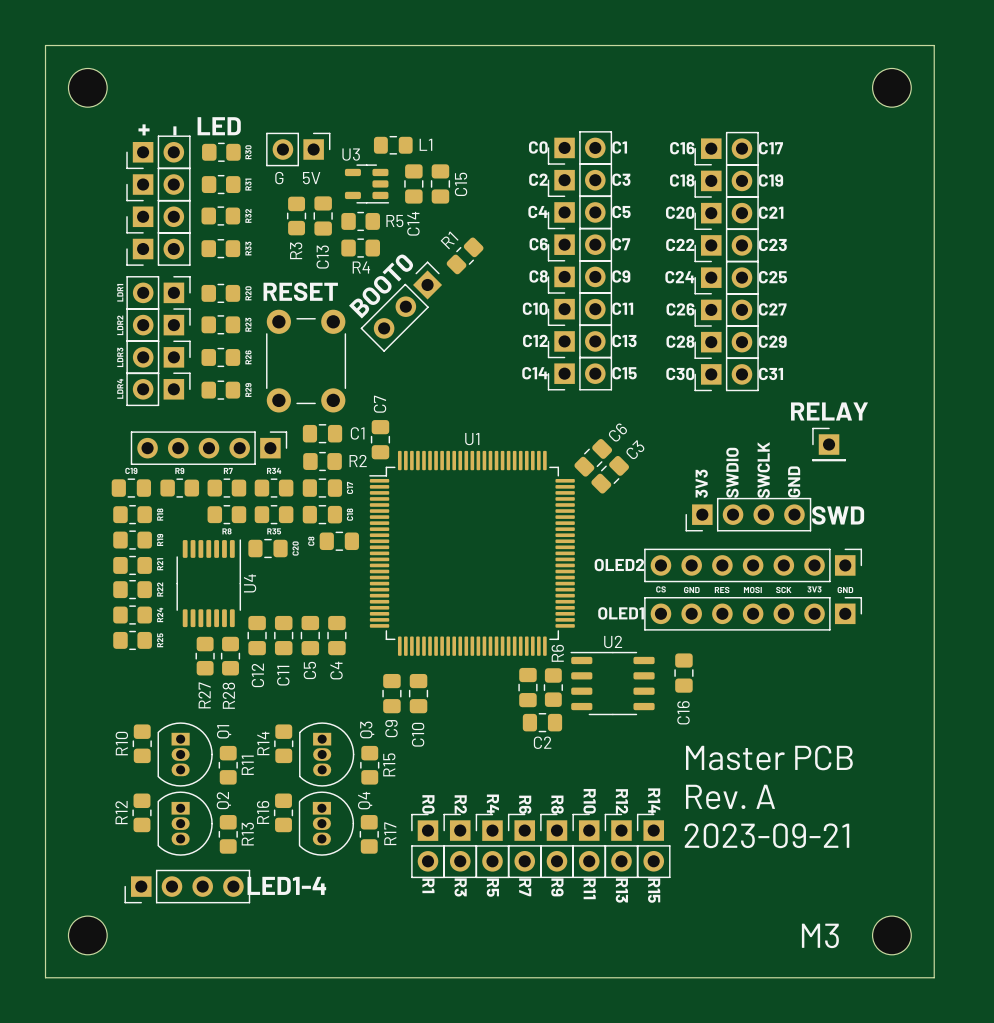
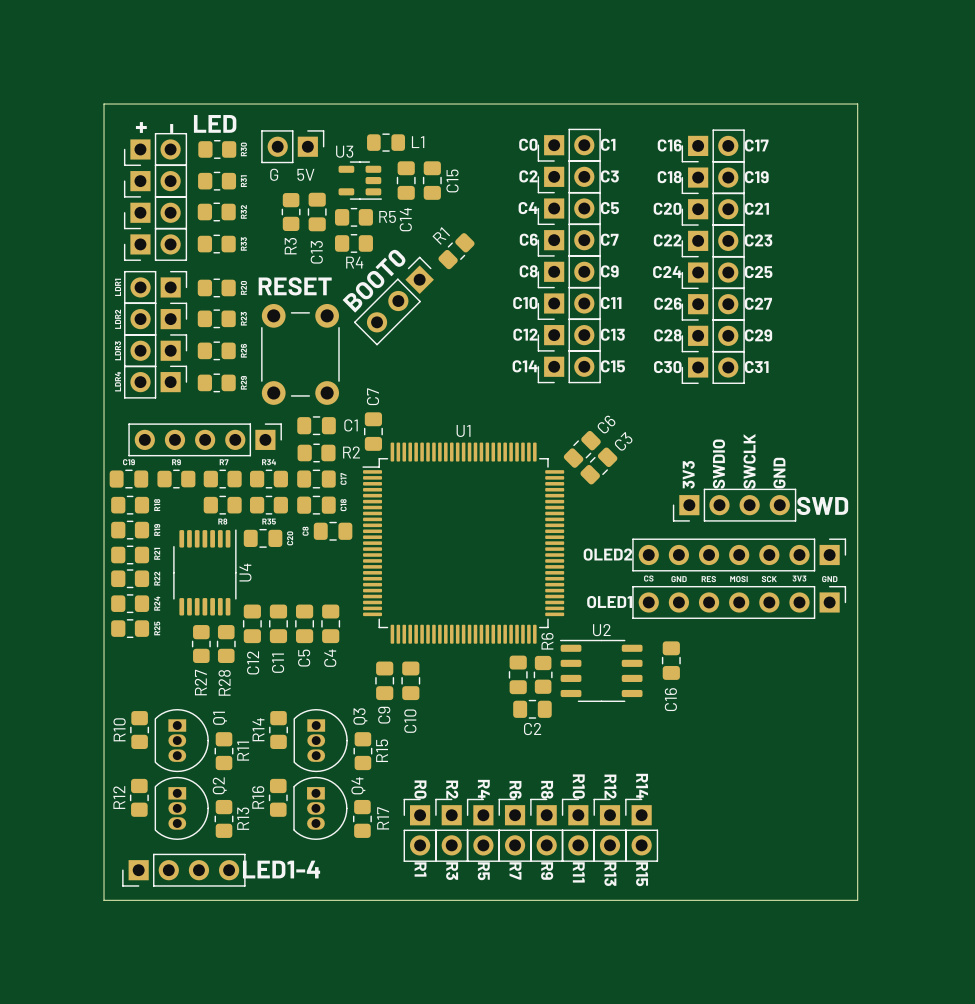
board edge: (45, 45) (934, 45) (934, 977) (45, 977) (45, 45) -> (104, 104) (104, 900) (857, 900) (857, 104) (104, 104)
part: (87, 87) -> none
part: (891, 87) -> none
text: RELAY (829, 411) -> none
part: (829, 444) -> none
text: Master PCB (769, 757) -> none
text: Rev. A (730, 796) -> none
text: 2023-09-21 (766, 835) -> none
part: (87, 935) -> none
text: M3 (820, 935) -> none
part: (891, 935) -> none

